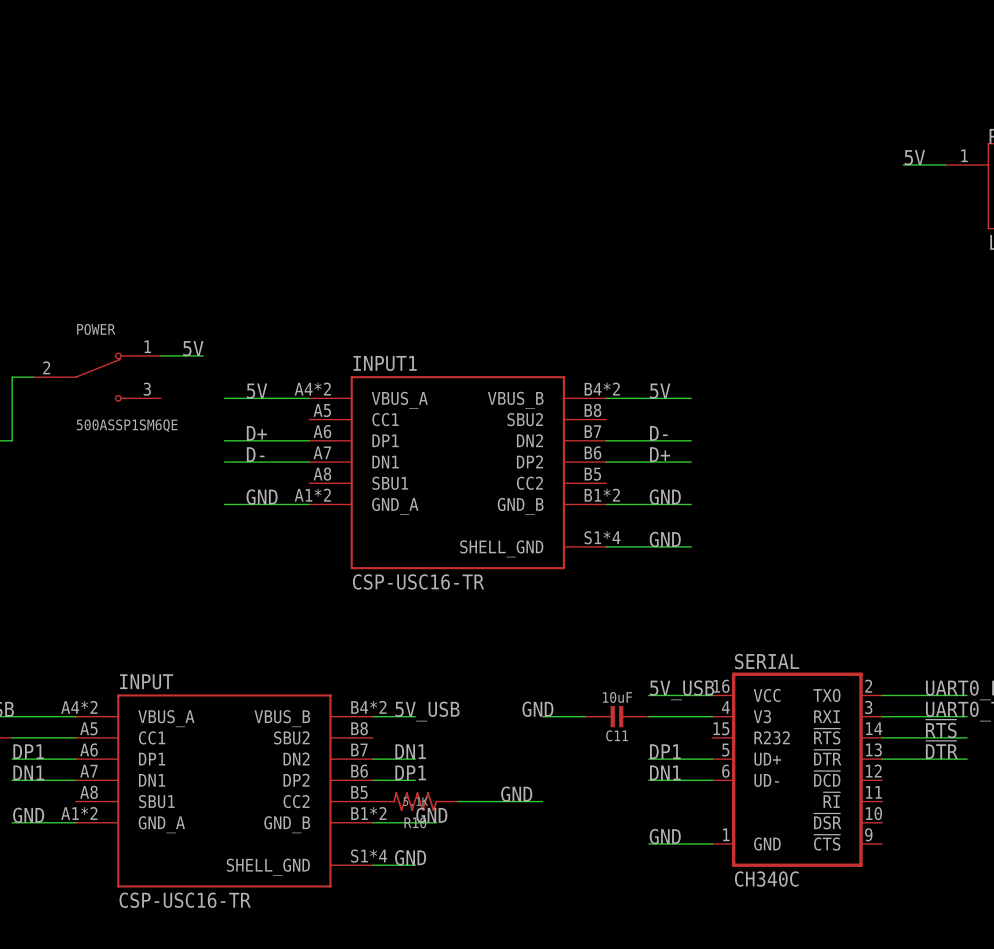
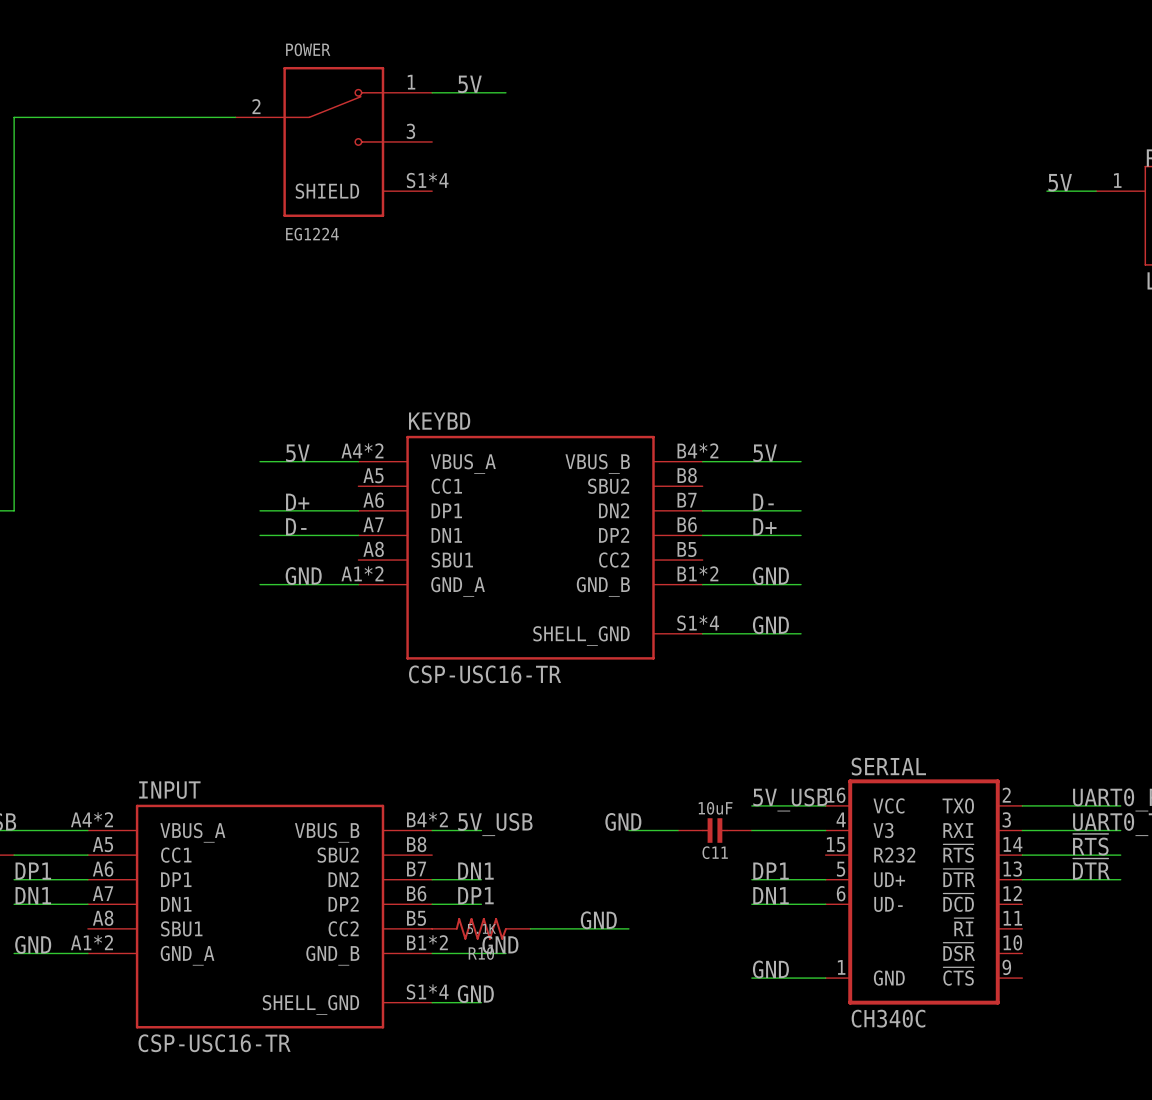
label: none -> 5V (470, 84)
wire: none -> (432, 92) (505, 92)
POWER: none -> EG1224 (333, 141)
label: 5V (193, 348) -> none
wire: (160, 355) (203, 355) -> none
INPUT1 name: INPUT1 (385, 363) -> KEYBD (439, 421)
wire: (12, 377) (33, 377) -> (14, 437) (14, 117) (235, 117)
POWER: 500ASSP1SM6QE (97, 377) -> none

